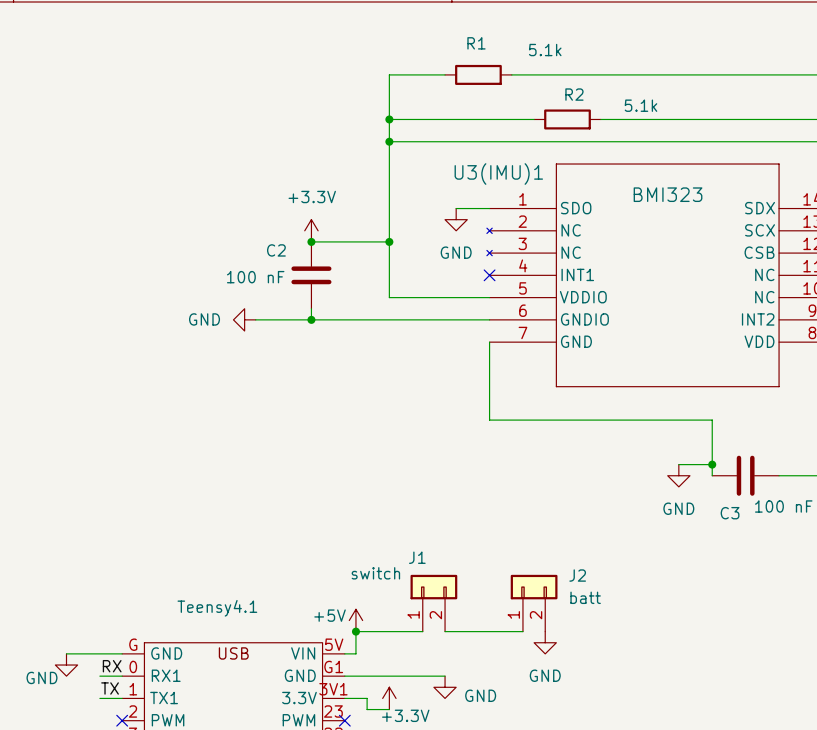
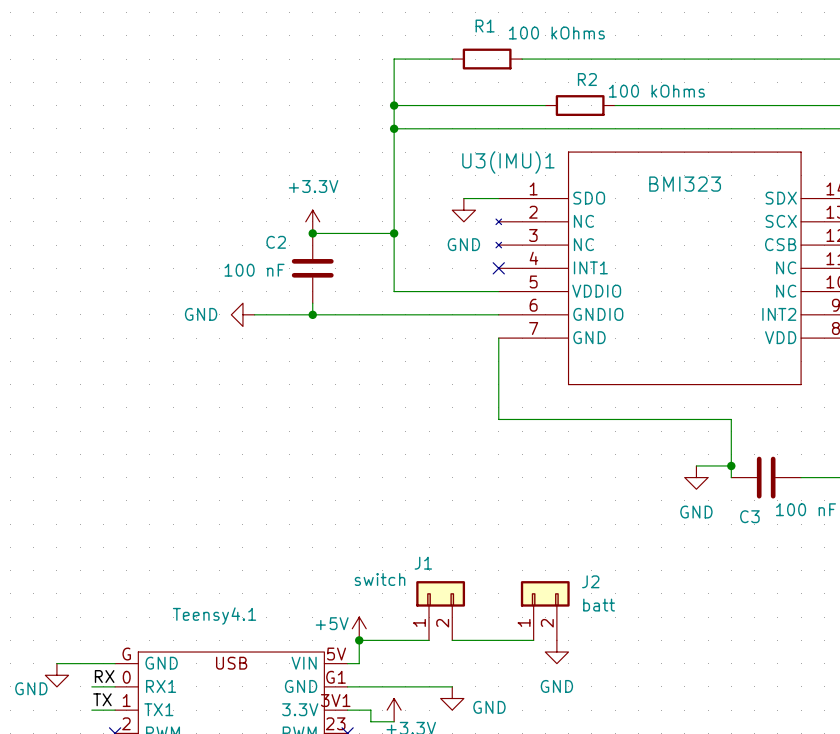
R1 value: 5.1k (545, 50) -> 100 kOhms (556, 33)
R2 value: 5.1k (640, 105) -> 100 kOhms (656, 91)

